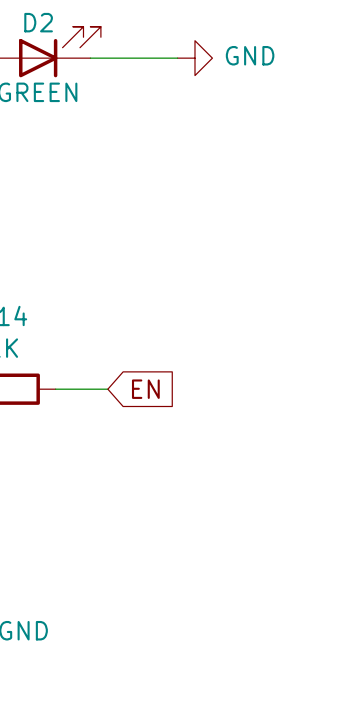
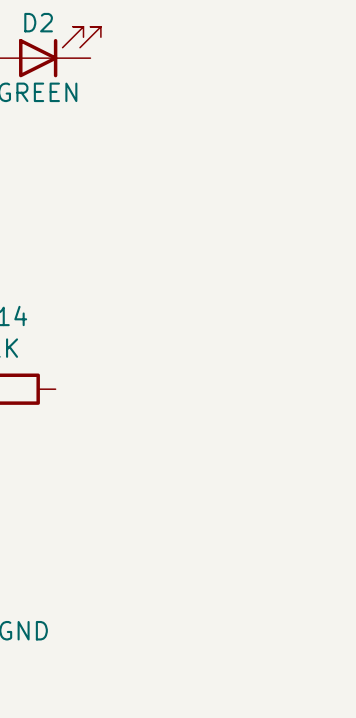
wire: (90, 58) (177, 58) -> none
power symbol: GND (194, 58) -> none
wire: (55, 389) (107, 389) -> none
global label: EN (145, 389) -> none

